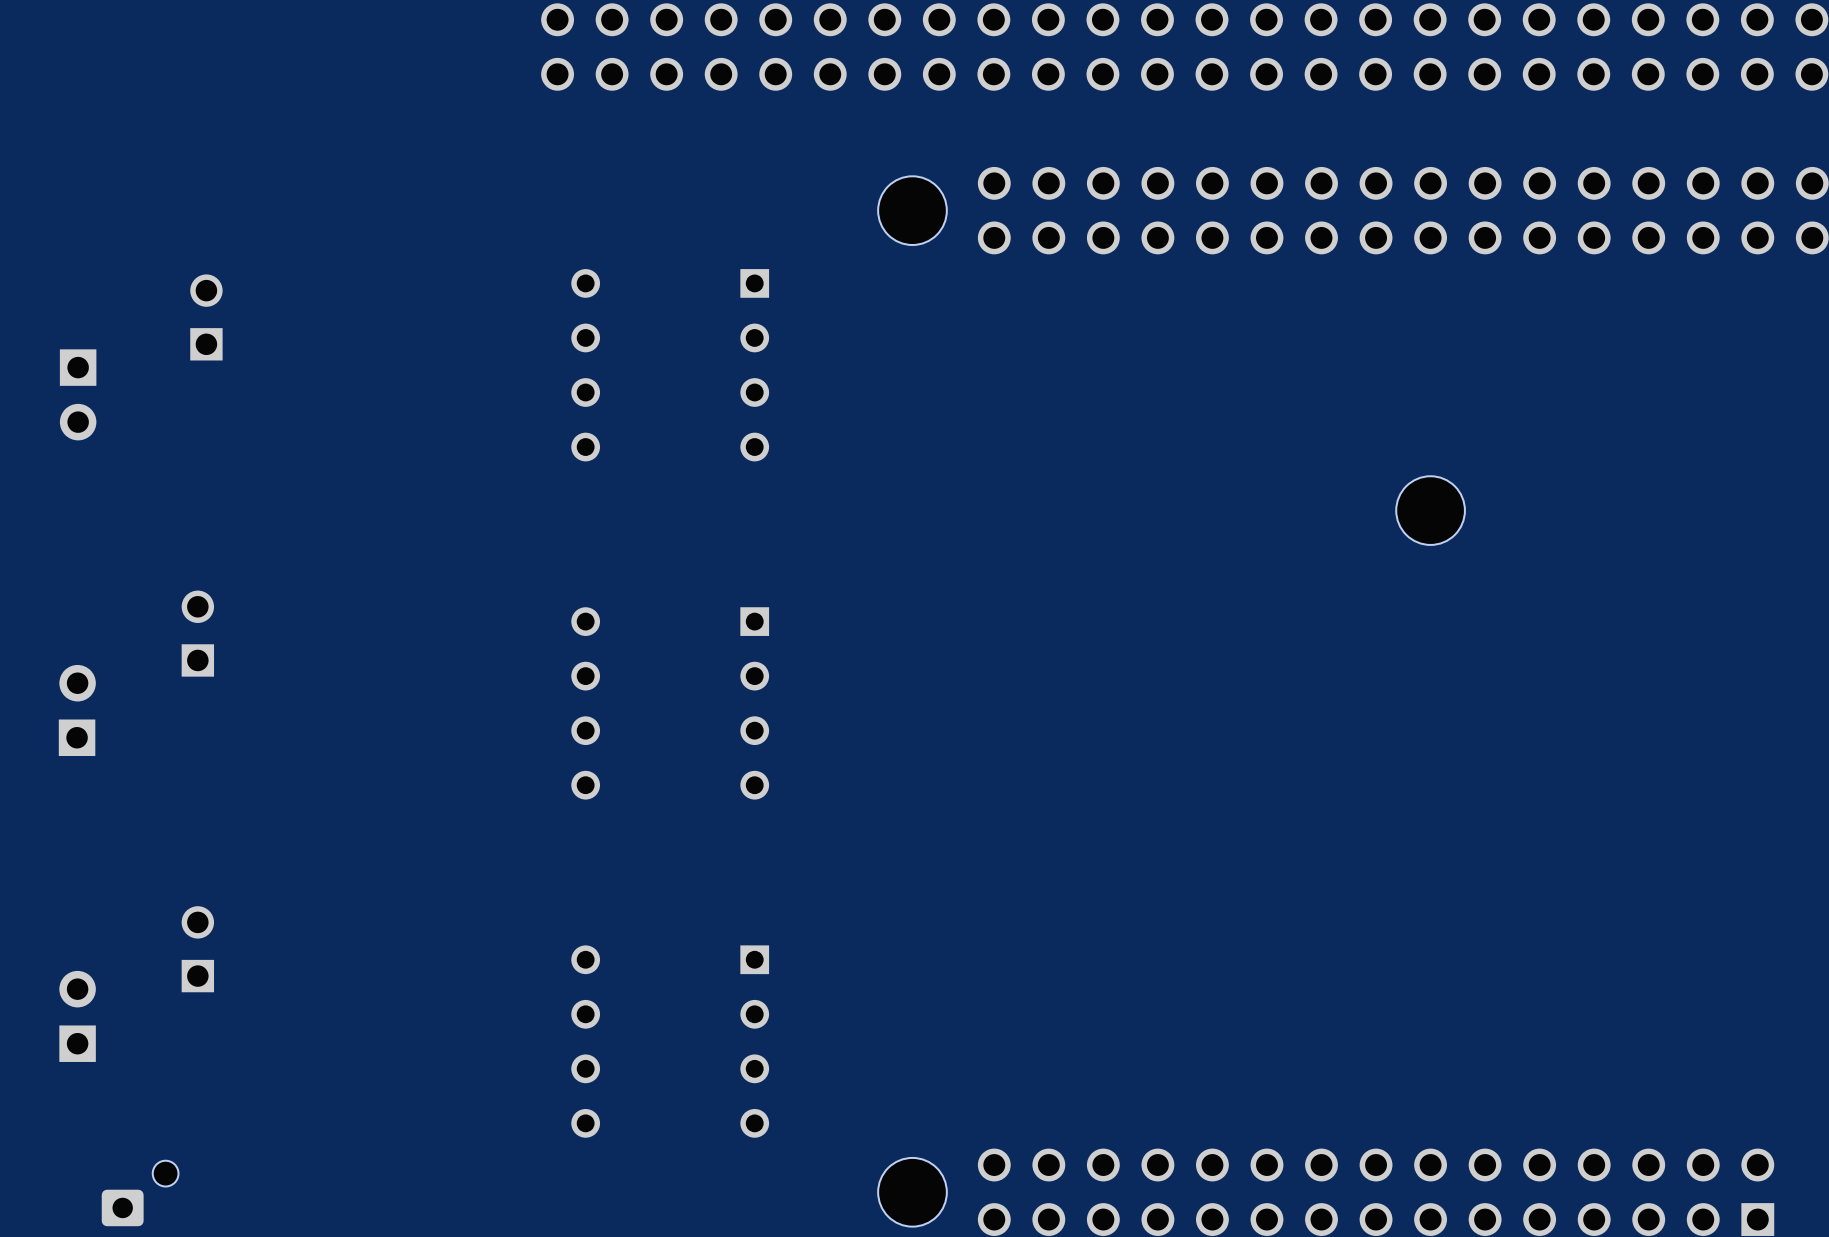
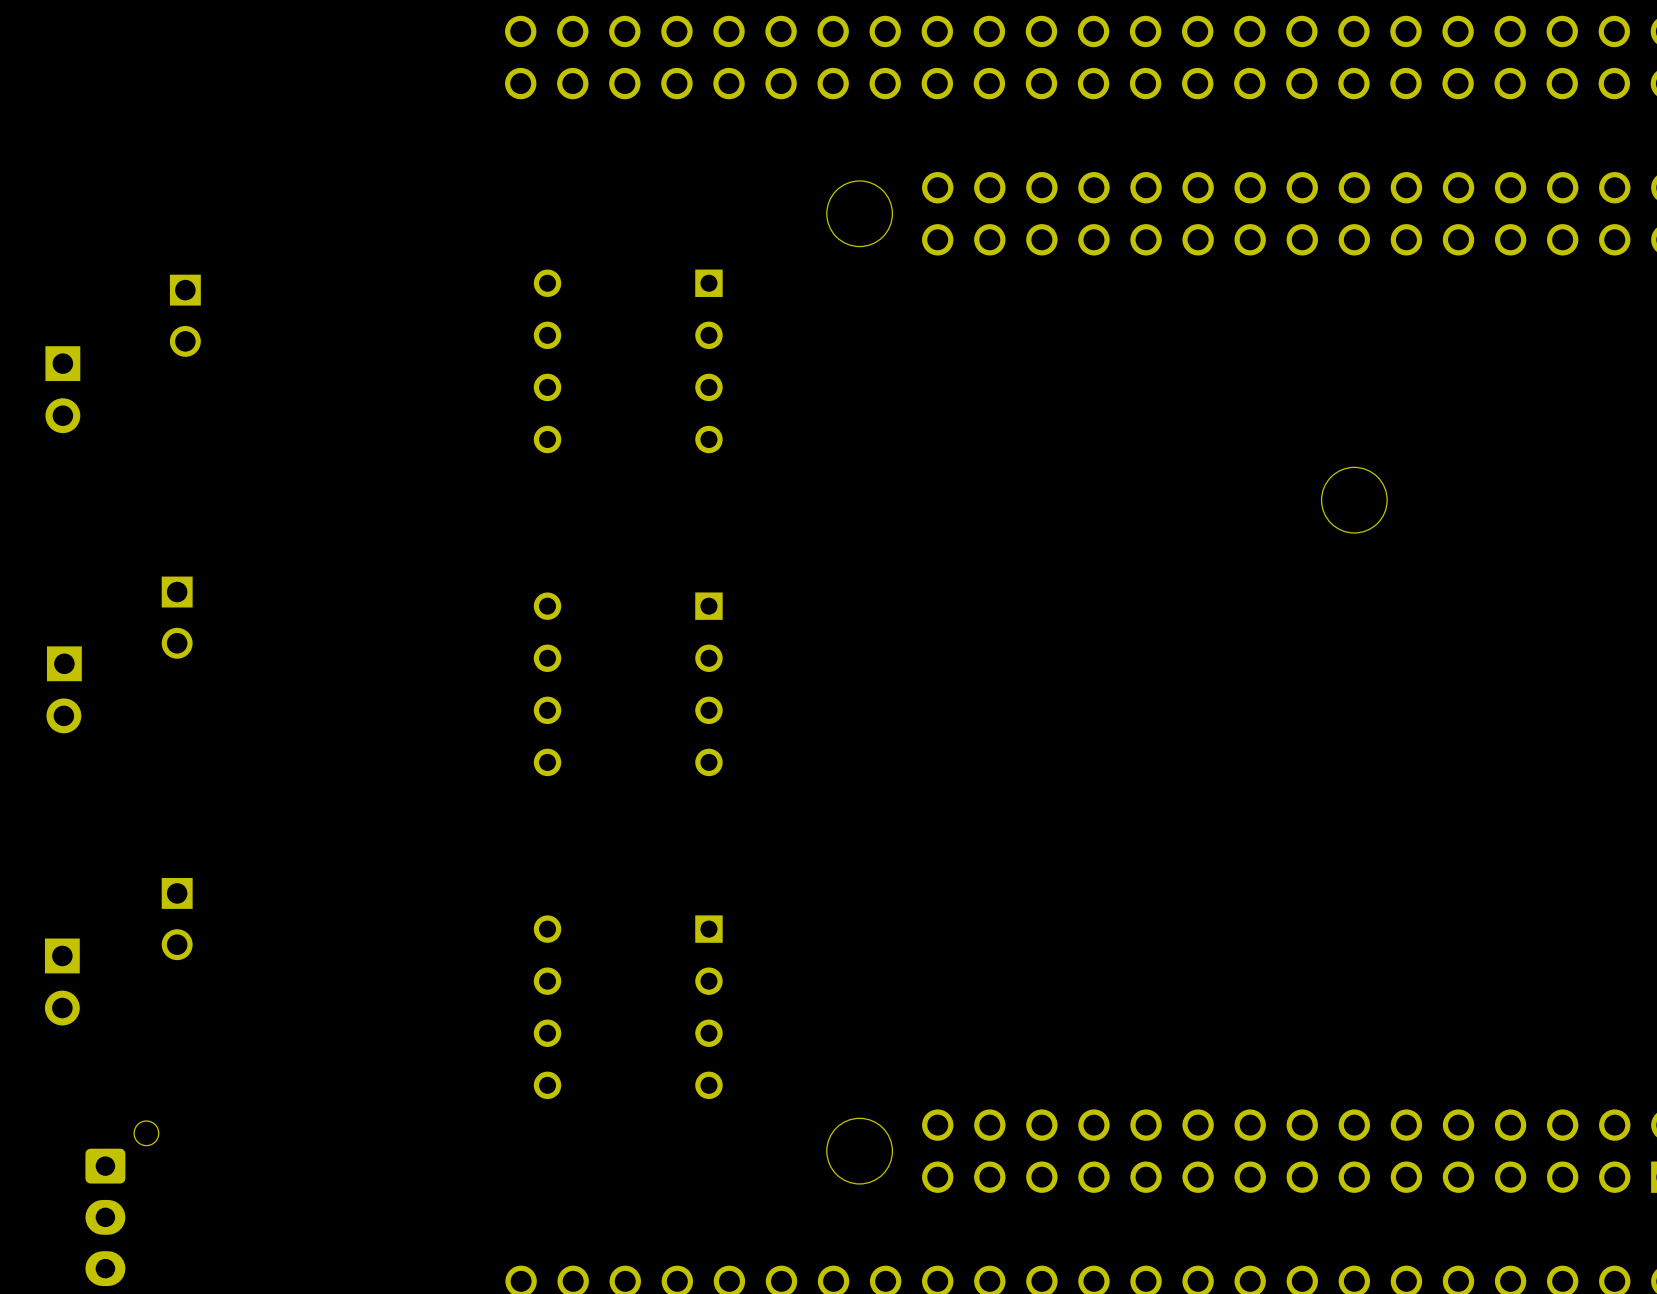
part rotation: 0° (206, 317) -> 180° (185, 315)
part rotation: 0° (197, 633) -> 180° (177, 617)
part rotation: 0° (77, 710) -> 180° (64, 689)
part rotation: 0° (197, 949) -> 180° (177, 919)
part rotation: 0° (77, 1016) -> 180° (62, 982)

